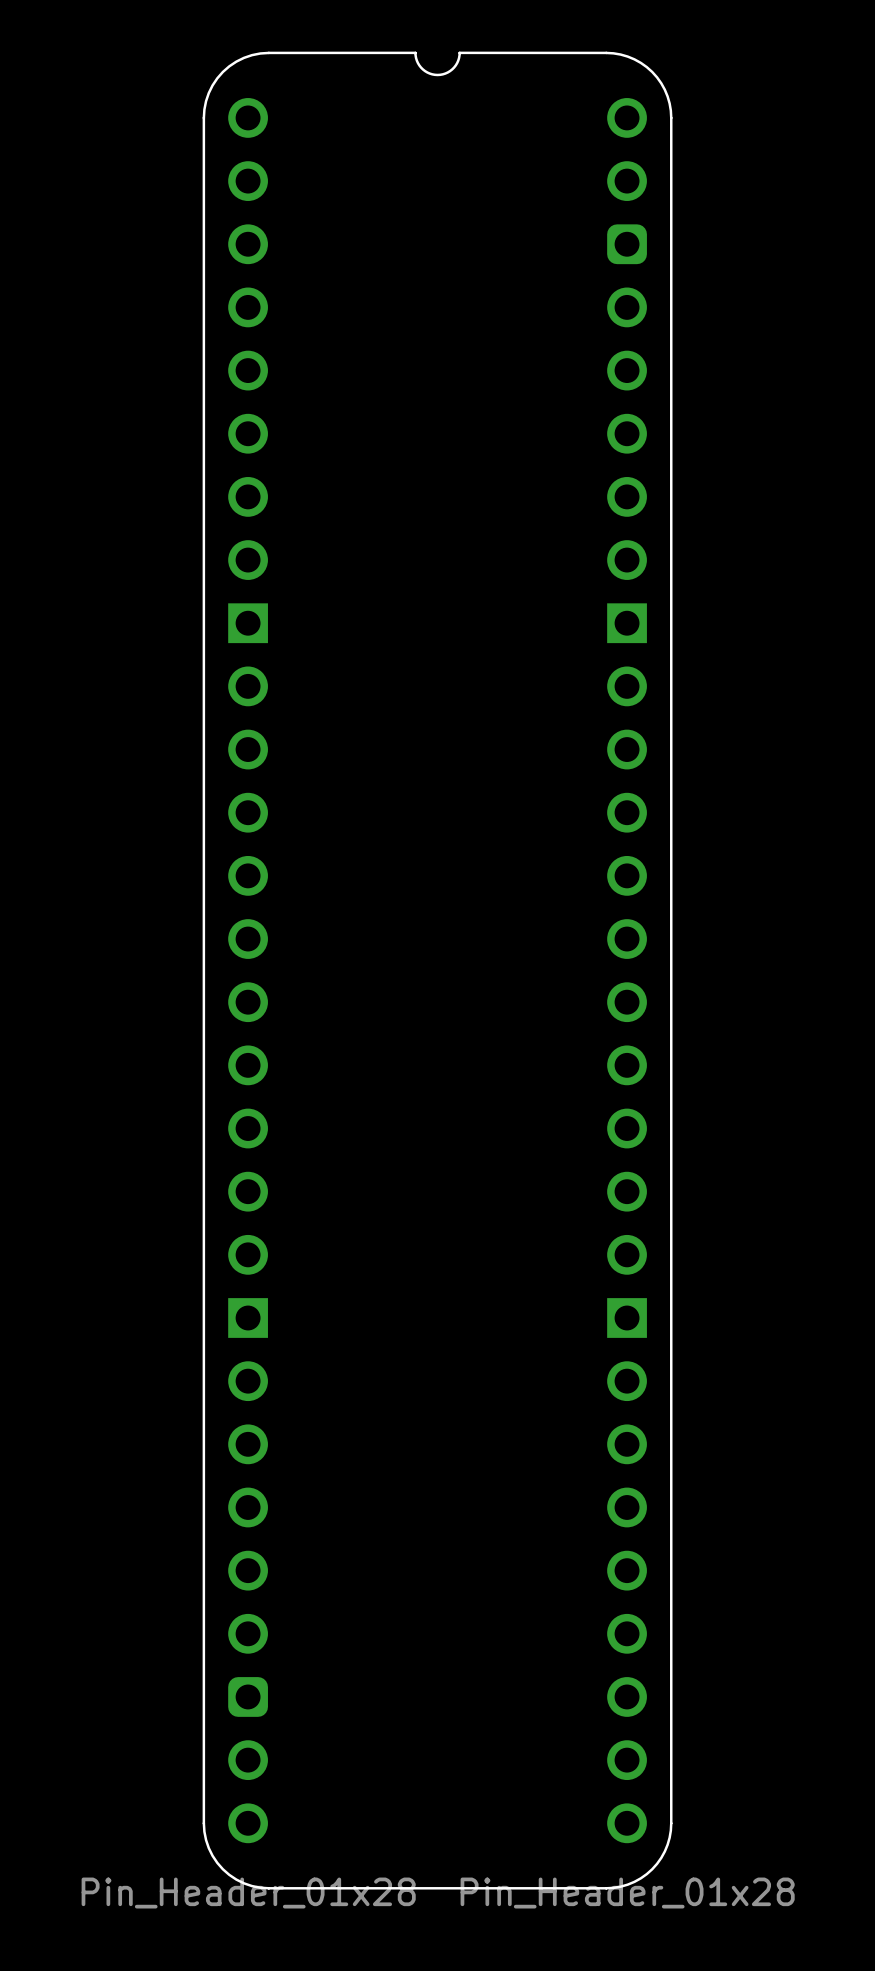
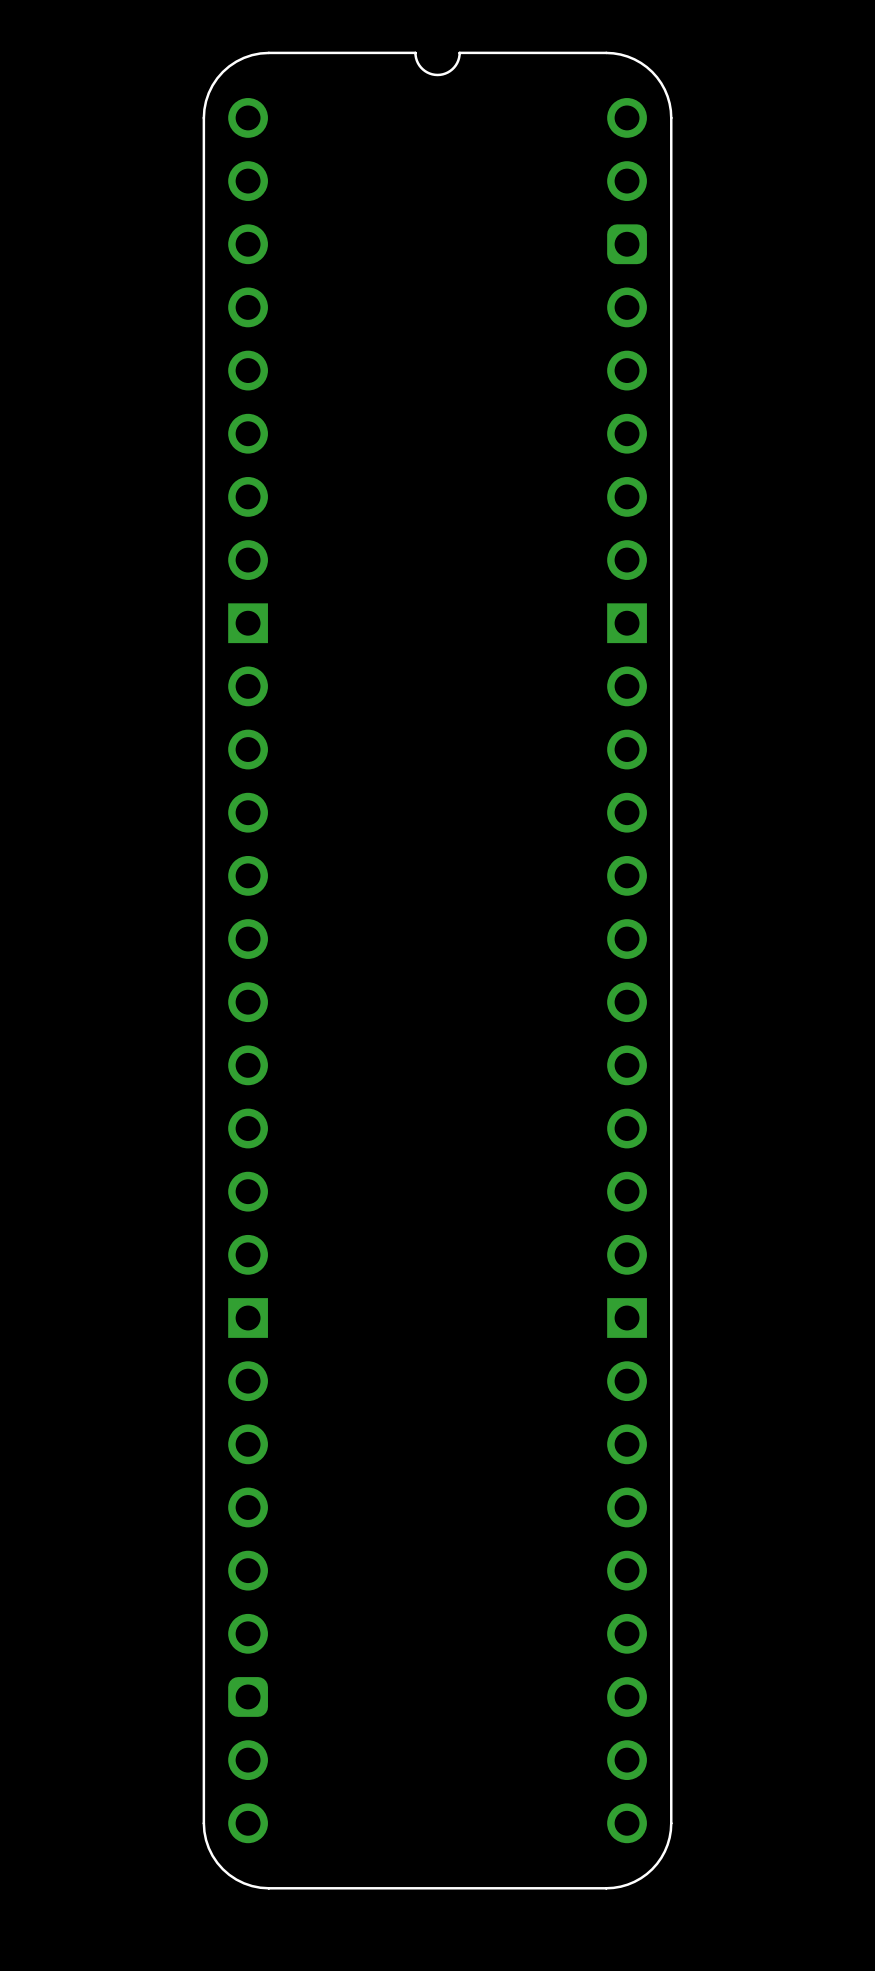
drawing: [81, 1877, 795, 1909] -> none

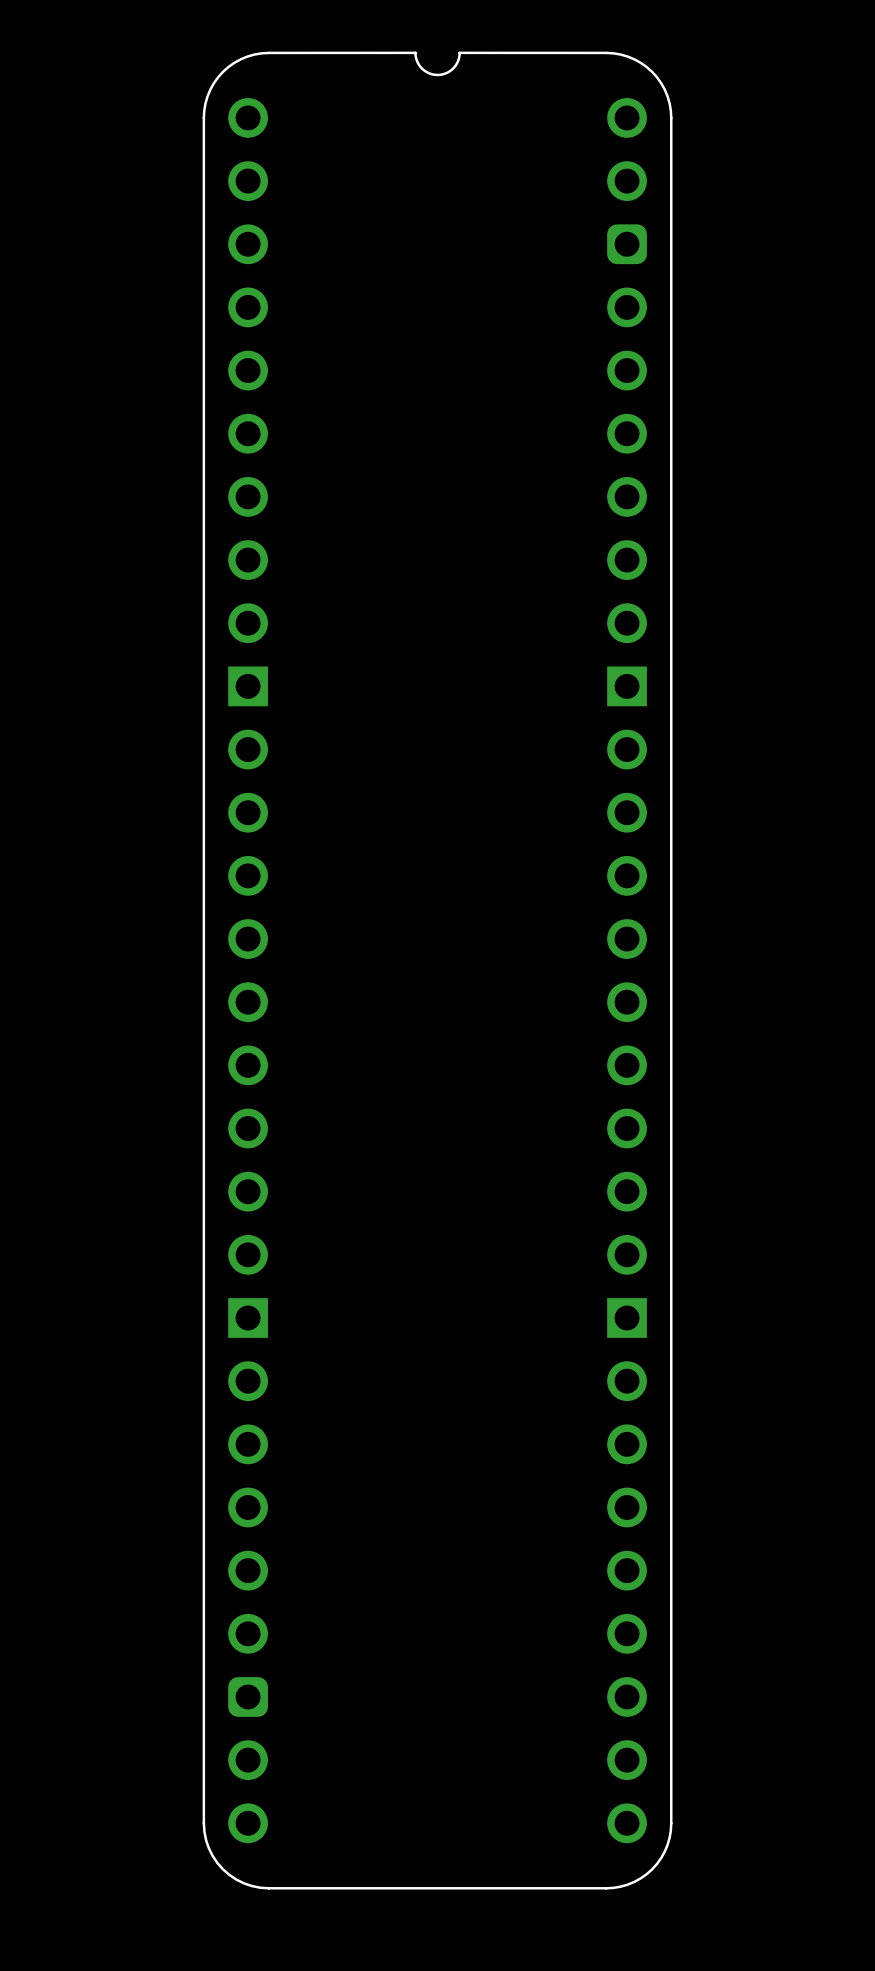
part footprint: [202, 51, 673, 1890] -> [202, 51, 673, 1890]

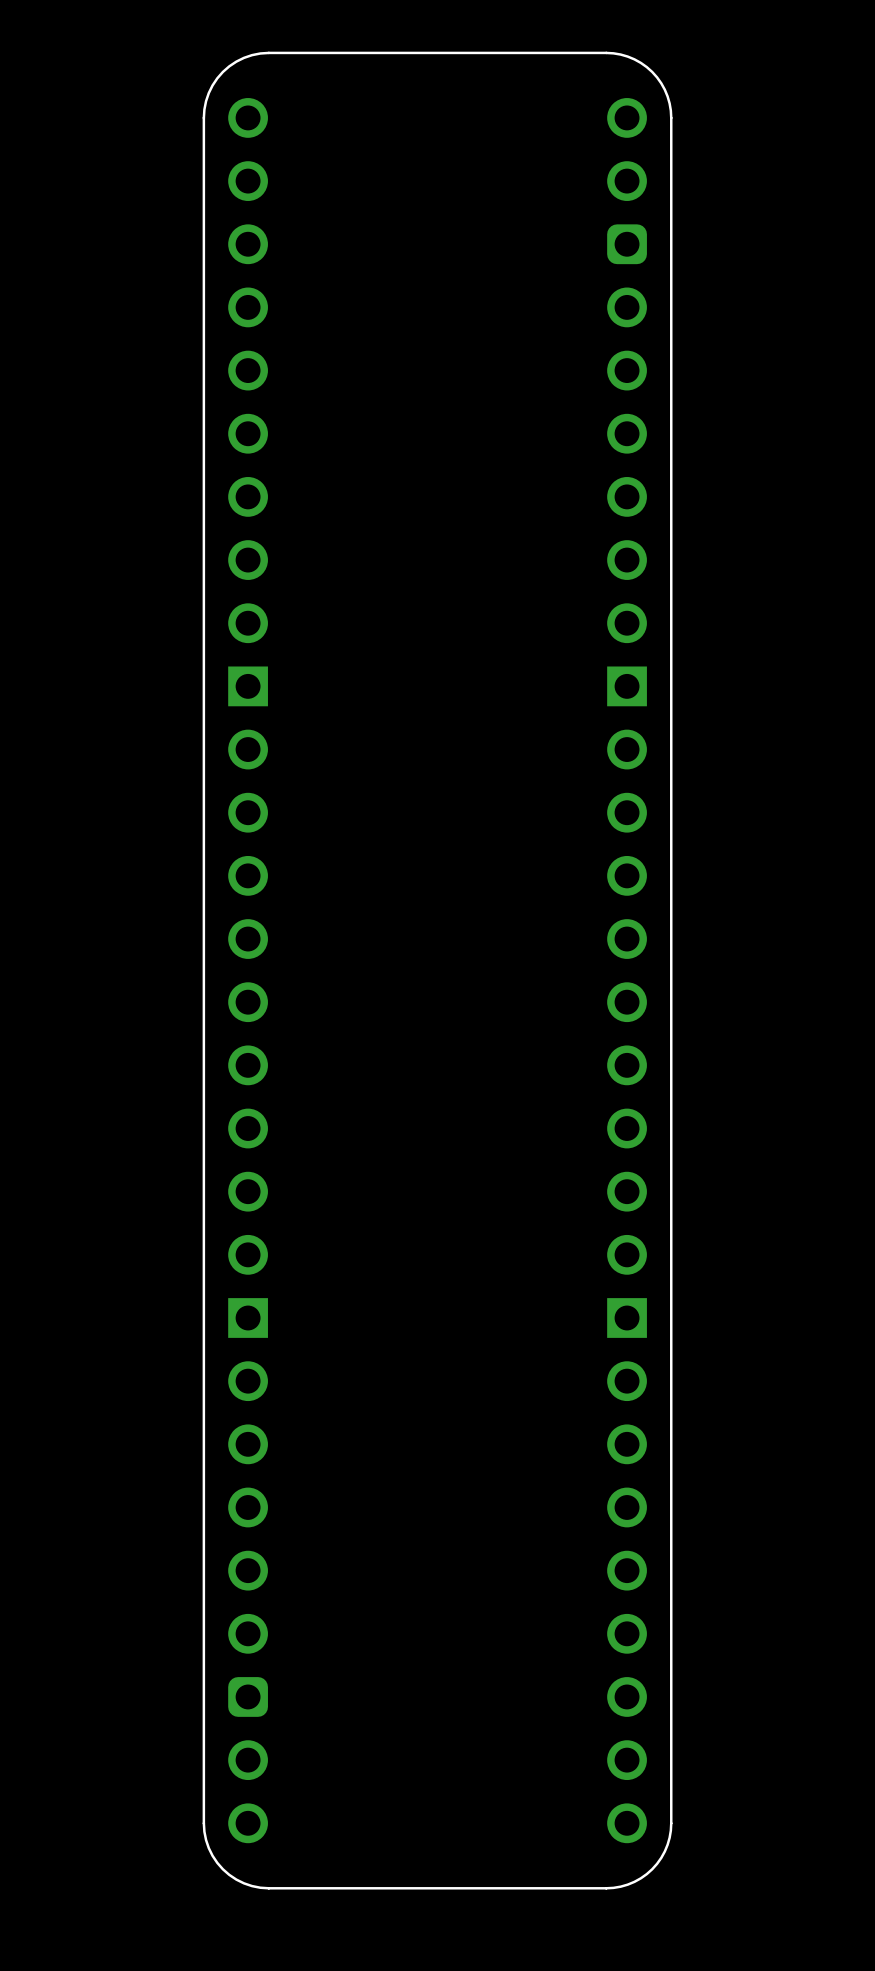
part footprint: [202, 51, 673, 1890] -> [202, 51, 673, 1890]

